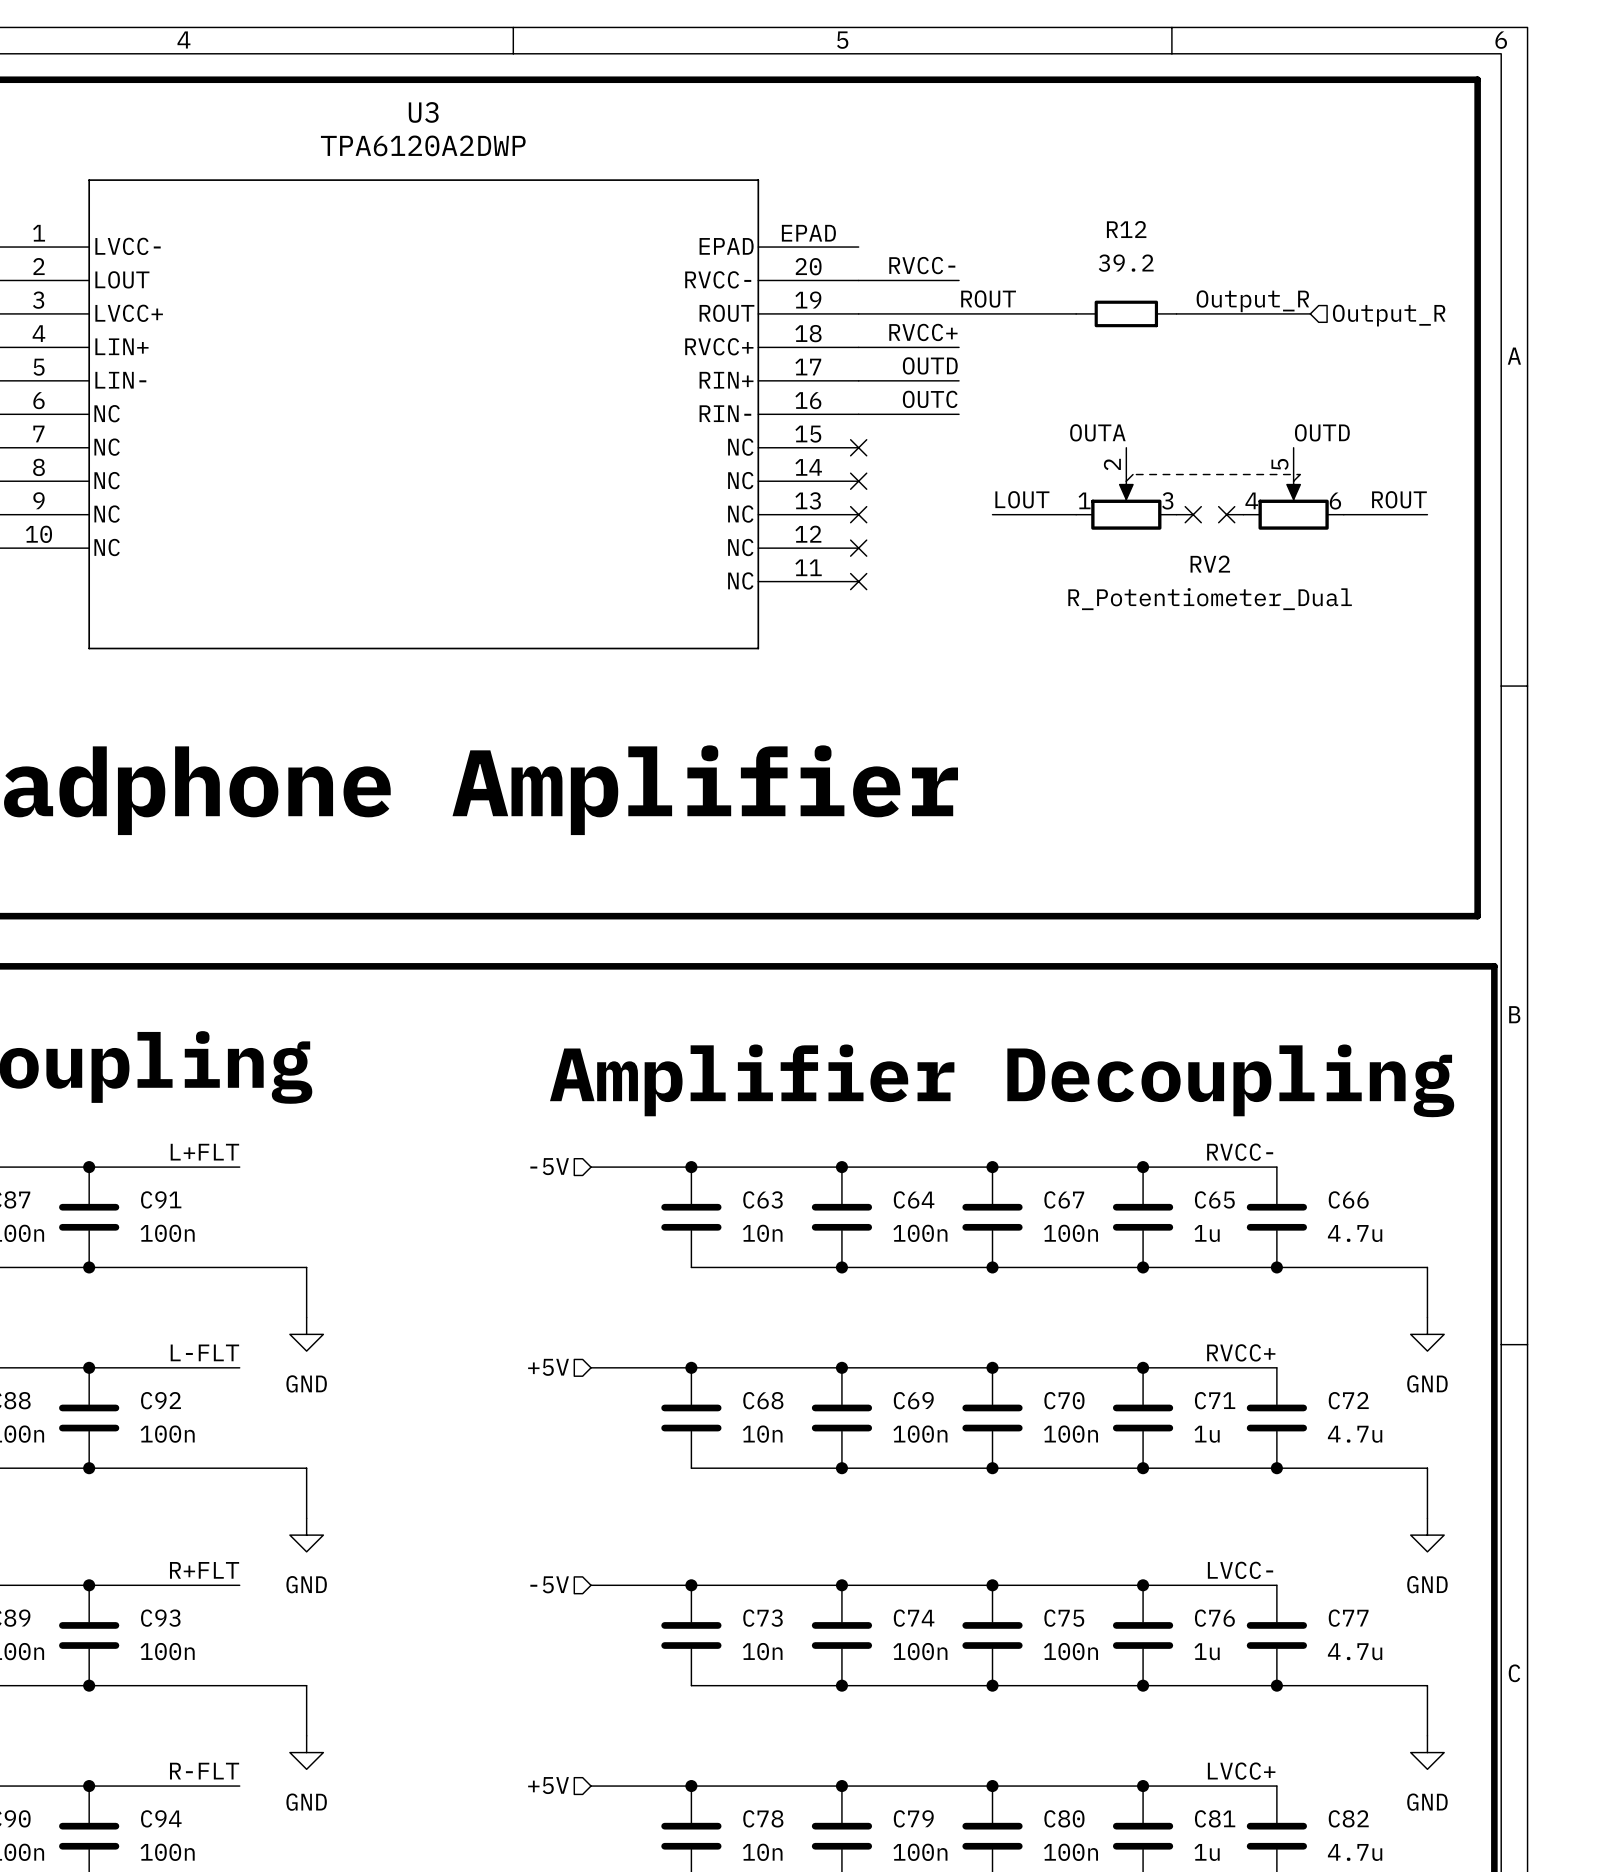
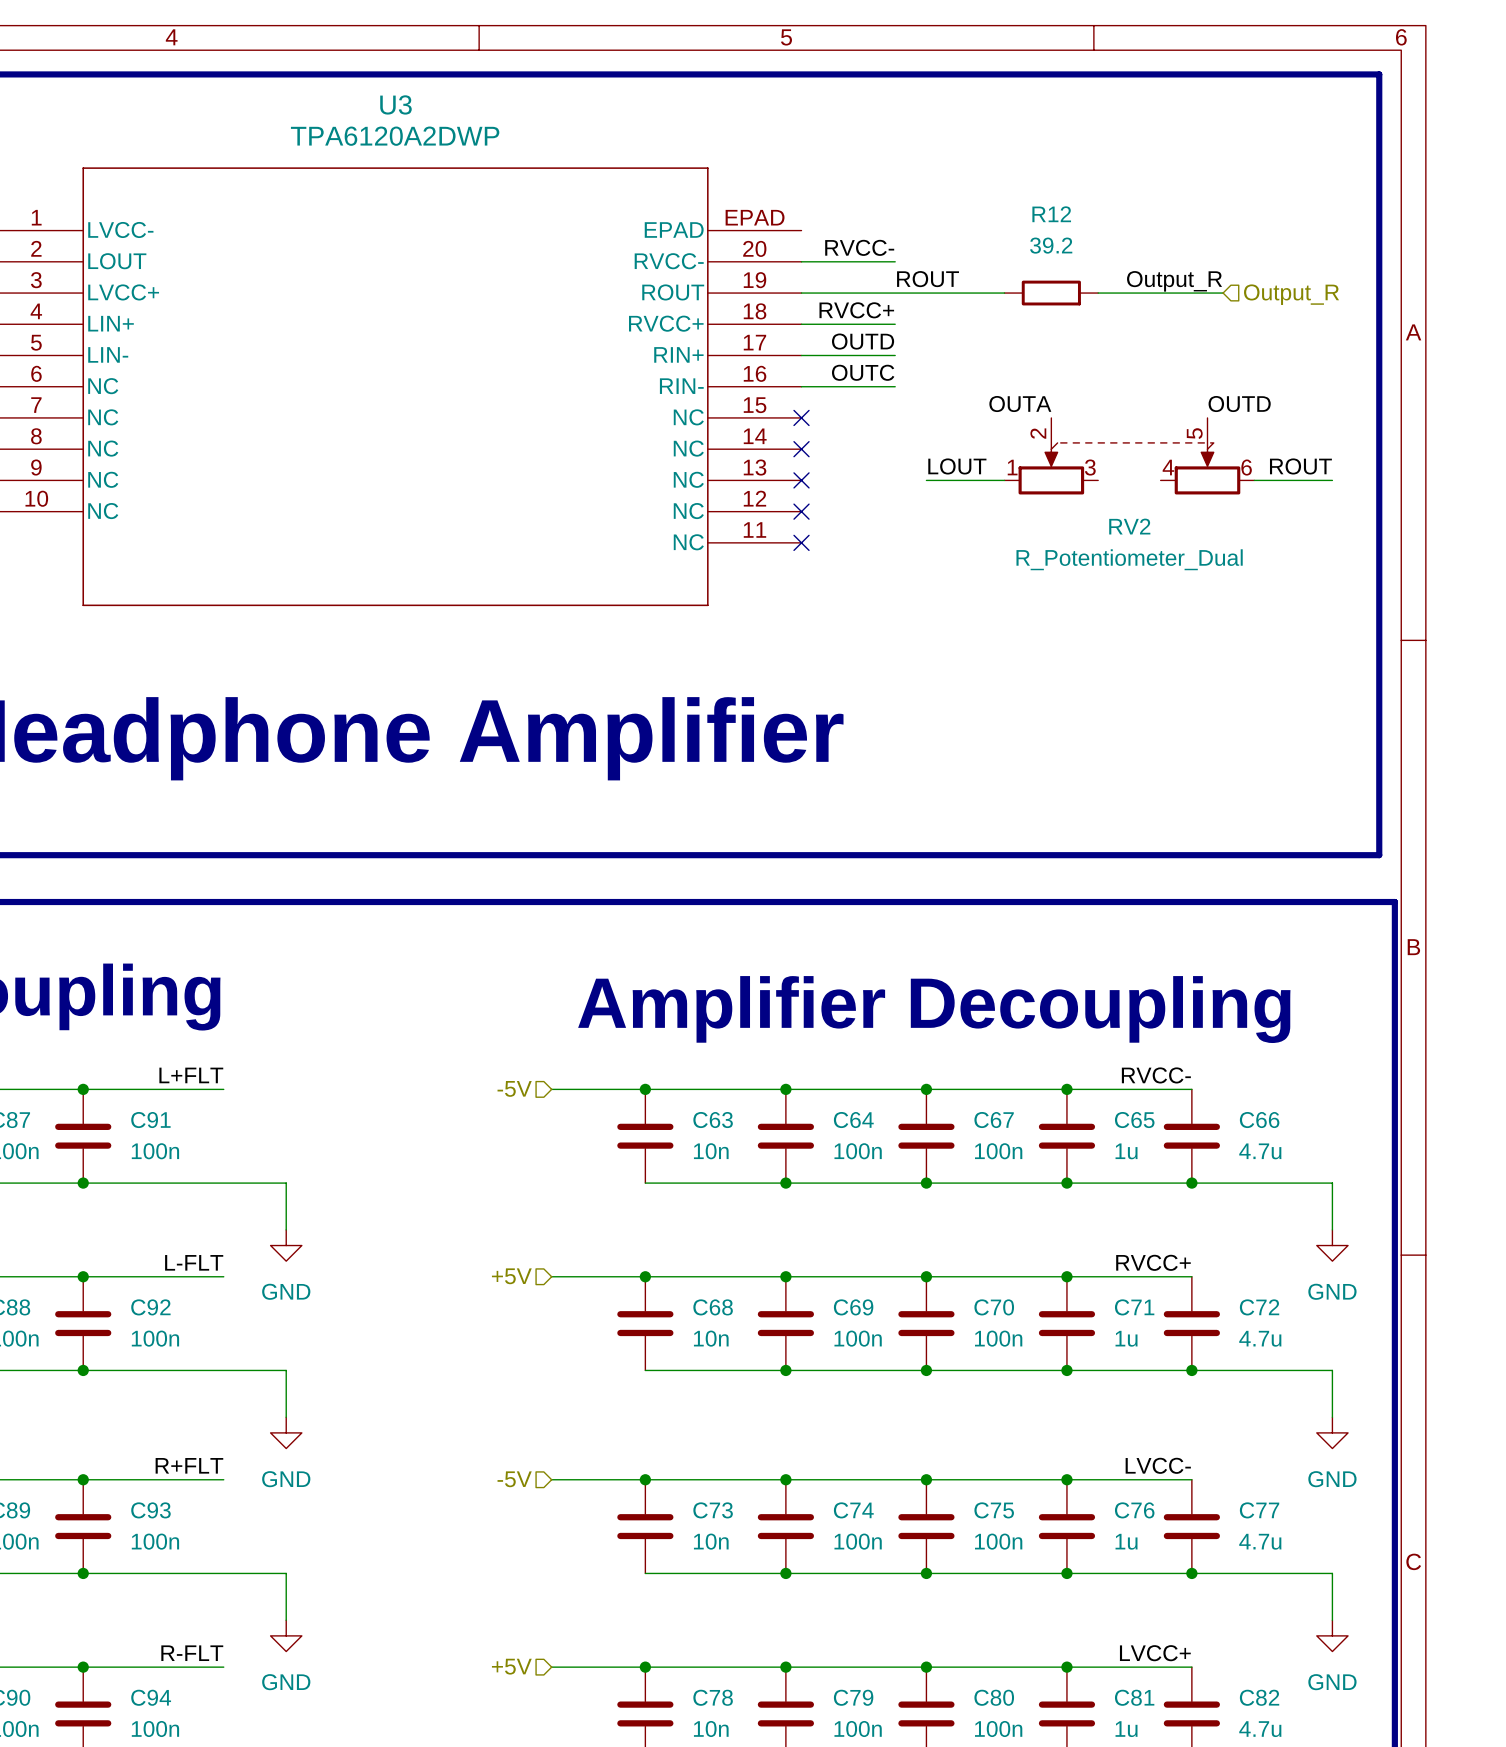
wire: (1176, 514) (1193, 514) -> none
no-connect mark: (1193, 514) -> none
wire: (1226, 514) (1243, 514) -> none
no-connect mark: (1226, 514) -> none

